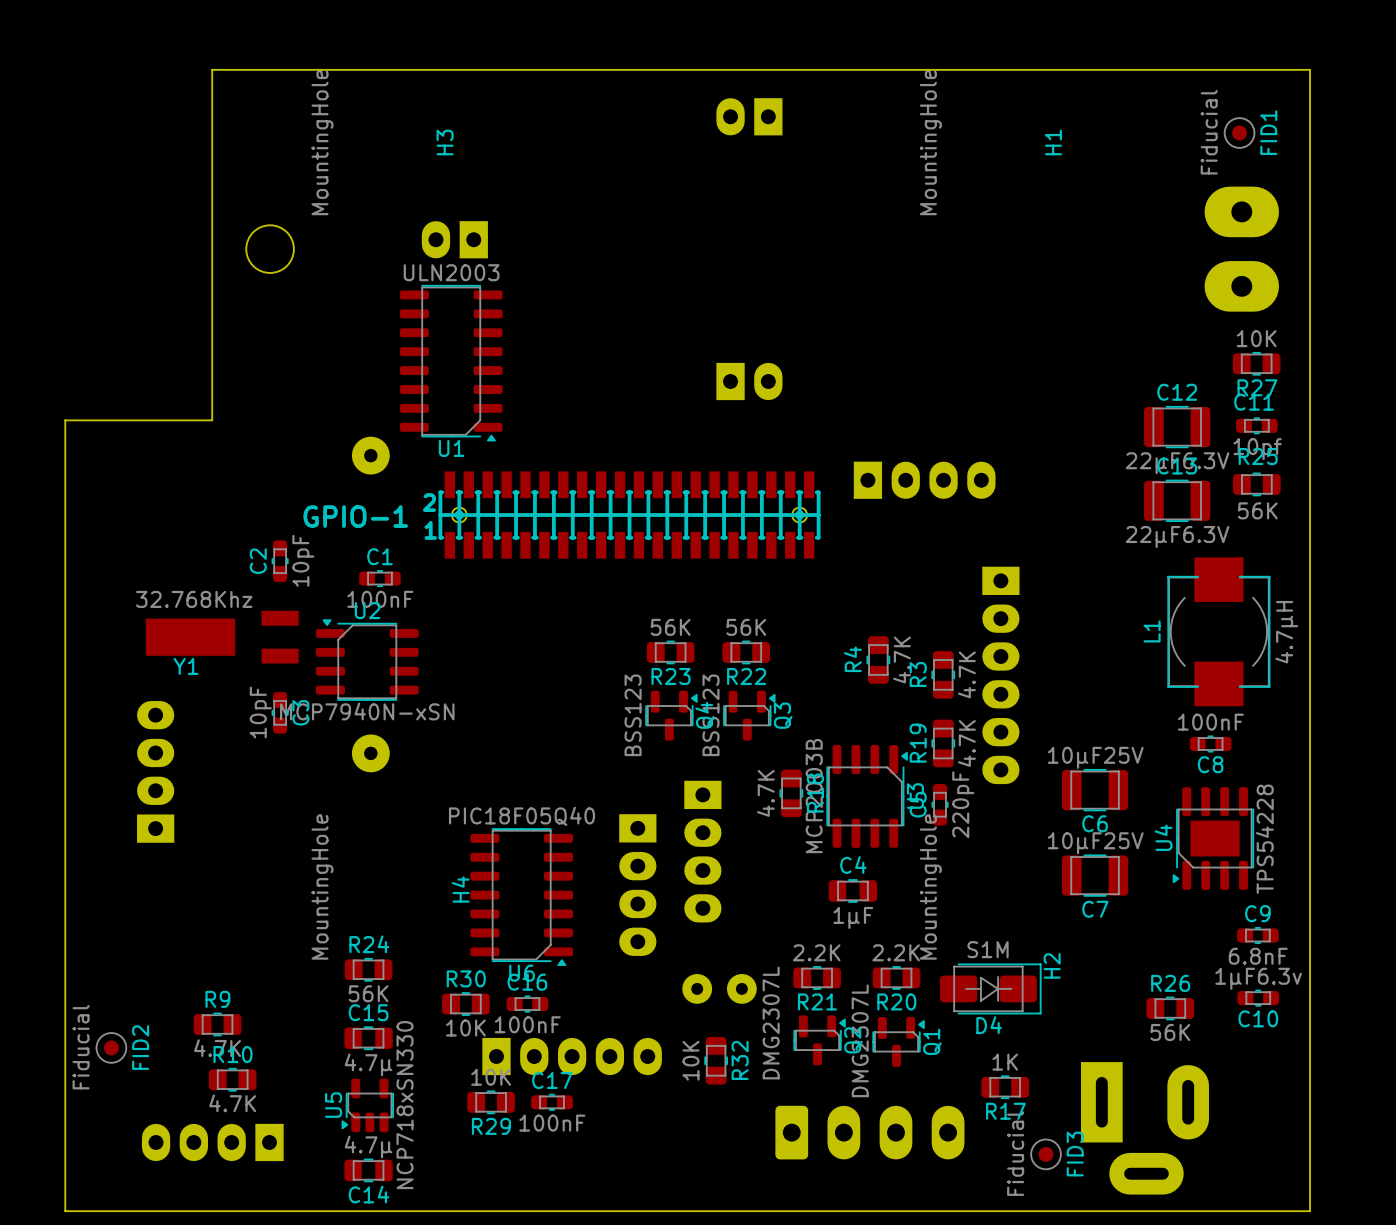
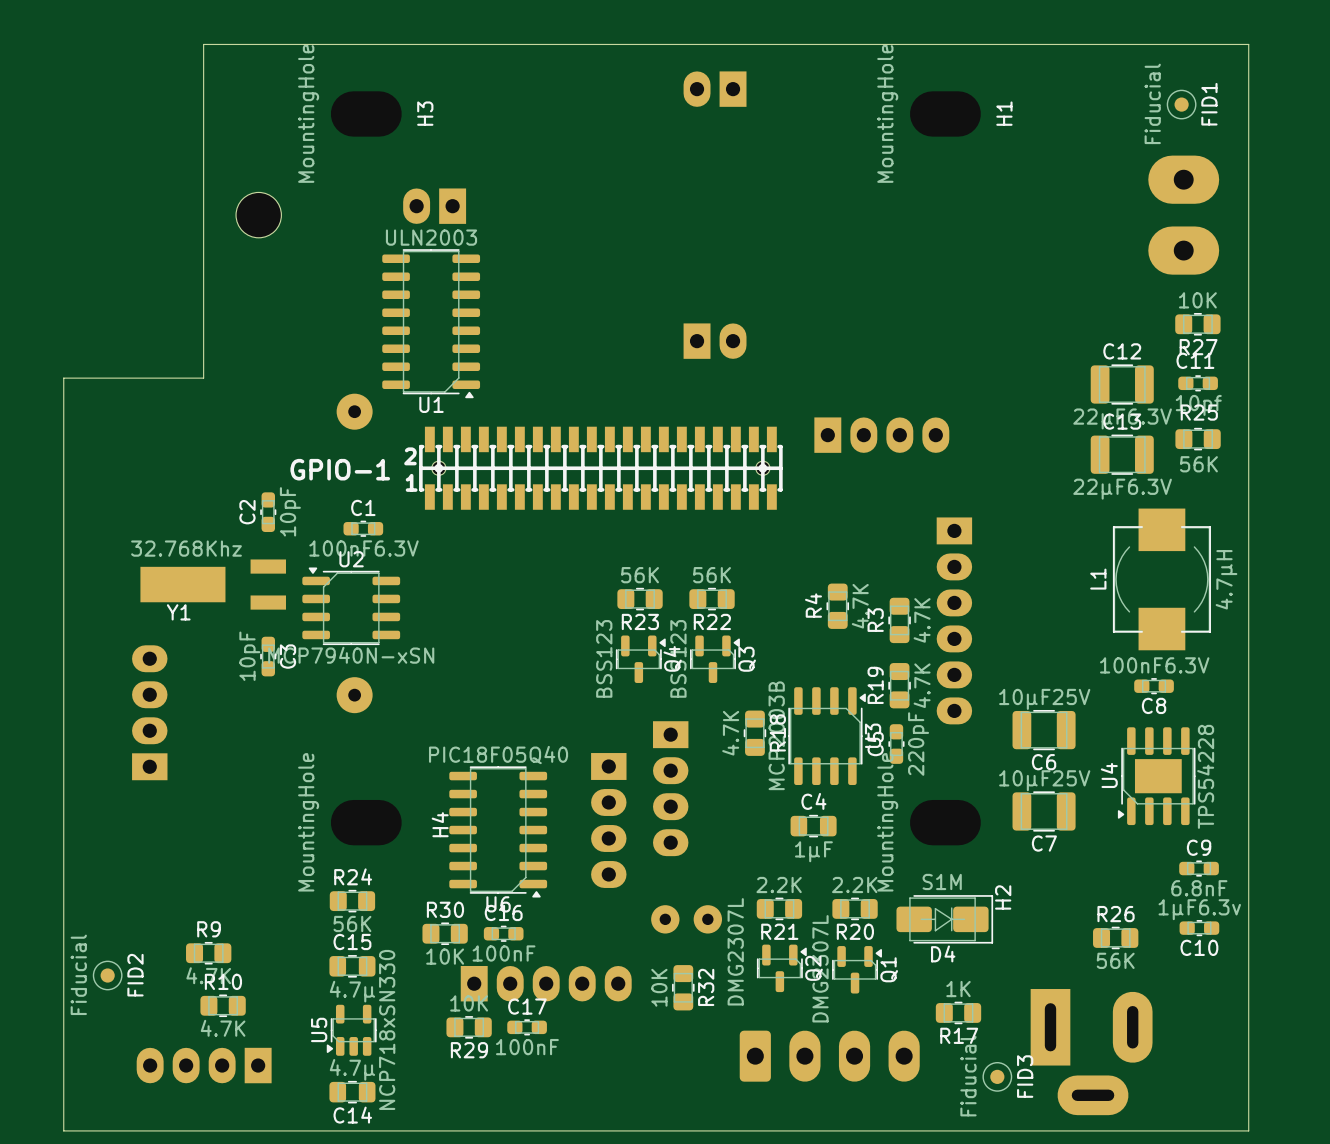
C1 value: 100nF (380, 599) -> 100nF6.3V (364, 548)
C8 value: 100nF (1210, 722) -> 100nF6.3V (1154, 665)

